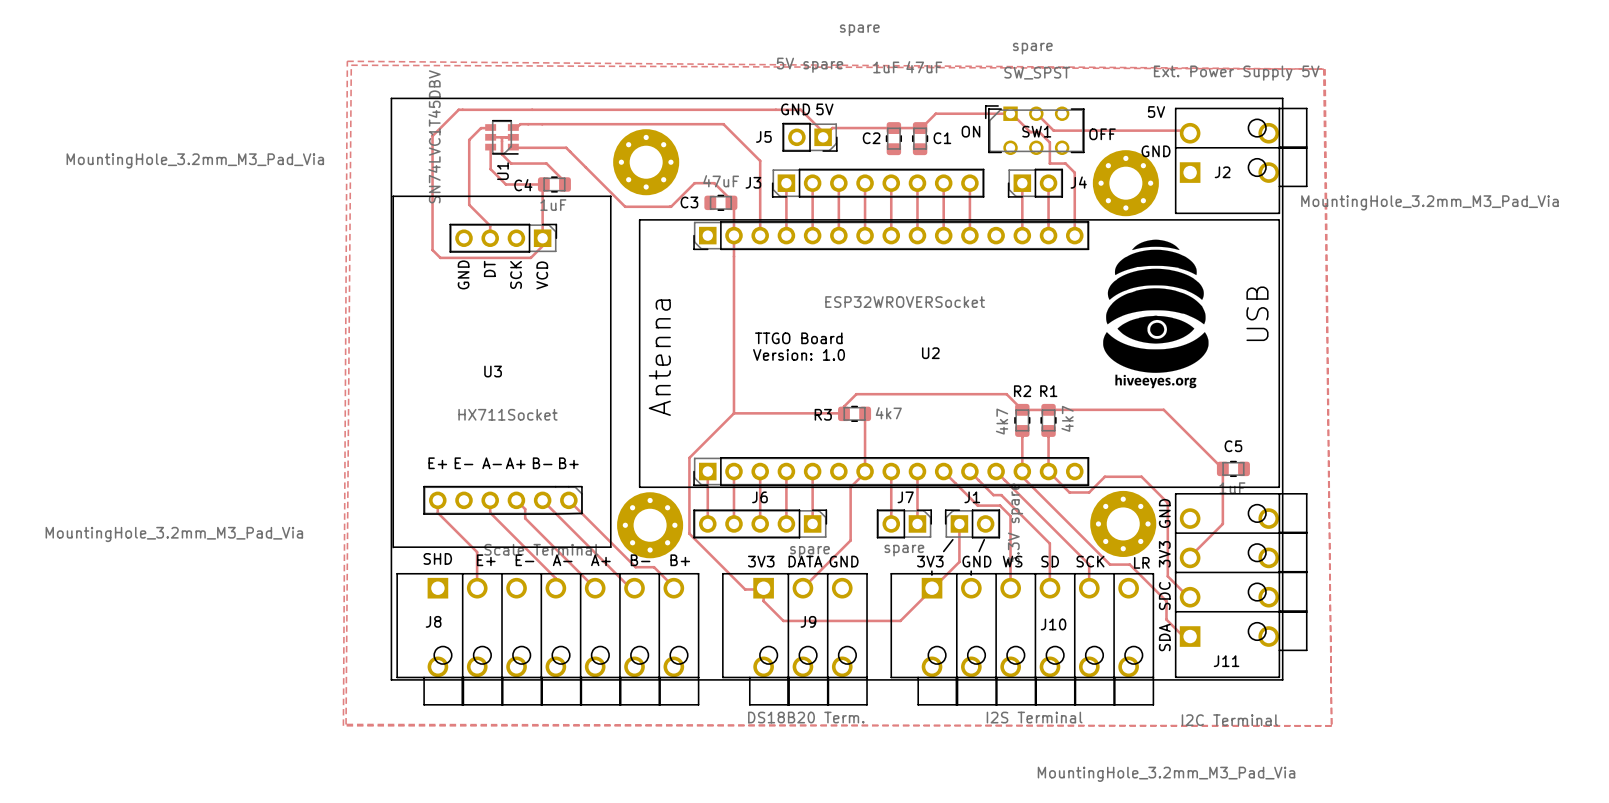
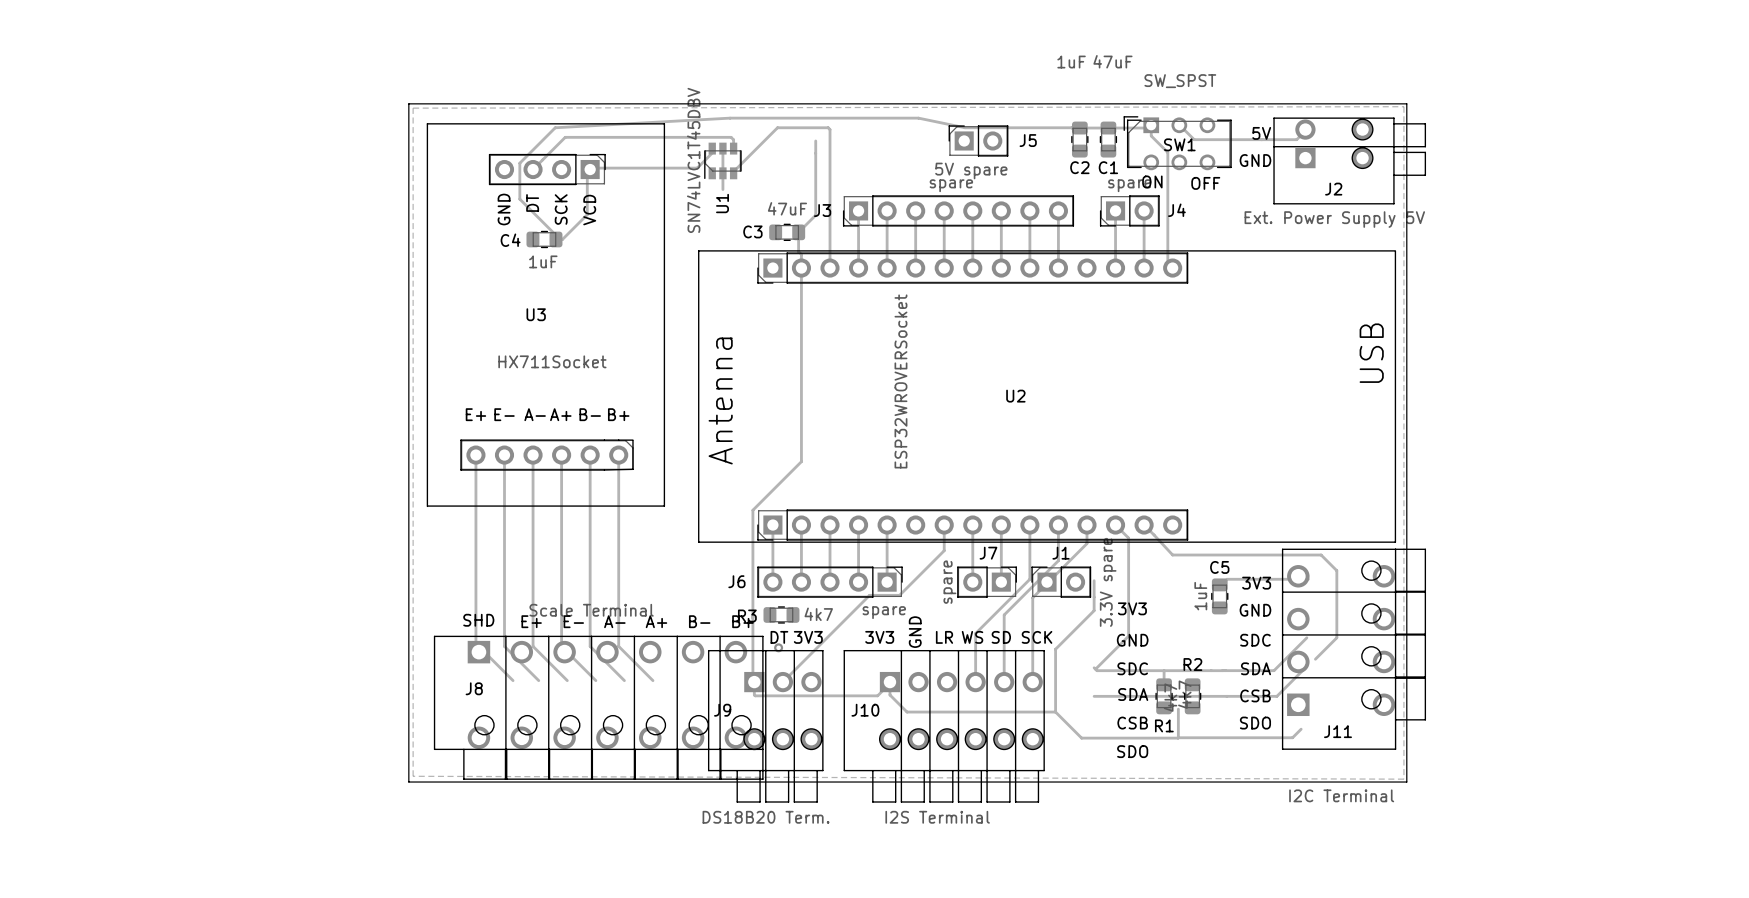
J3 value position: spare (859, 30) -> spare (951, 185)
J4 value position: spare (1032, 48) -> spare (1129, 185)
J5 value position: 5V spare (810, 65) -> 5V spare (971, 170)
J2 value position: Ext. Power Supply 5V (1236, 73) -> Ext. Power Supply 5V (1334, 219)
board edge: (391, 98) (391, 679) (1282, 679) (1282, 98) (391, 98) -> (408, 103) (408, 782) (1406, 782) (1406, 103) (408, 103)
track: none -> (1152, 123) (1148, 128) (1108, 128)
track: none -> (1151, 125) (1151, 135) (1167, 152) (1167, 264)
track: none -> (1179, 125) (1194, 139) (1296, 139) (1305, 130)
J2 footprint: [1175, 107, 1308, 214] -> [1273, 117, 1427, 205]
track: none -> (1106, 129) (1105, 128) (965, 127) (918, 118) (730, 118) (555, 127) (519, 163) (519, 199) (553, 232)
text: GND (795, 109) -> none
text: 5V (824, 109) -> none
track: (1010, 113) (935, 113) (921, 128) -> none
track: (1036, 113) (1053, 130) (1182, 130) -> none
track: (1017, 118) (1030, 132) (1039, 132) (1049, 142) (1049, 163) (1065, 163) (1074, 172) (1074, 235) -> none
track: none -> (722, 148) (722, 172)
track: none -> (733, 148) (733, 139) (731, 137) (565, 137) (533, 169)
track: (487, 128) (481, 128) (469, 139) (469, 204) (490, 225) (490, 238) -> none
track: (516, 128) (520, 124) (723, 124) (760, 160) -> (732, 172) (777, 127) (828, 127) (830, 129) (830, 186)
track: none -> (712, 152) (697, 168) (590, 168)
track: (918, 129) (832, 128) (829, 130) -> none
track: (821, 130) (800, 109) (458, 109) (432, 136) (432, 250) (440, 257) (530, 257) (543, 244) -> none
SW1 position: (1034, 130) -> (1177, 143)
text position: ON (970, 131) -> ON (1152, 181)
text position: OFF (1102, 134) -> OFF (1205, 183)
U1 value position: SN74LVC1T45DBV (434, 136) -> SN74LVC1T45DBV (693, 160)
track: (490, 137) (513, 137) -> none
track: (502, 137) (502, 154) (511, 163) (546, 163) (564, 181) -> none
U1 rotation: 0° (502, 137) -> 90° clockwise (722, 160)
U1 position: (502, 137) -> (722, 160)
J5 rotation: 0° (810, 137) -> 180° (978, 140)
J5 position: (810, 137) -> (978, 140)
C2 name position: C2 (871, 138) -> C2 (1079, 167)
C2 position: (893, 138) -> (1079, 139)
C1 position: (920, 138) -> (1108, 139)
C1 name position: C1 (942, 138) -> C1 (1108, 167)
track: none -> (587, 168) (587, 214) (562, 239) (555, 239)
track: (490, 147) (490, 169) (505, 184) (543, 184) -> none
track: (513, 147) (566, 147) (625, 206) (671, 206) (694, 183) (714, 183) (728, 197) -> none
track: none -> (722, 173) (722, 189)
text position: GND (1156, 151) -> GND (1255, 160)
part: MountingHole_3.2mm_M3_Pad_Via (646, 162) -> none
part: MountingHole_3.2mm_M3_Pad_Via (1125, 183) -> none
track: (542, 184) (542, 238) -> none
C4 position: (554, 184) -> (544, 239)
track: (733, 204) (733, 223) -> (815, 140) (815, 215) (798, 232) (798, 251) (801, 254)
drawing: [1103, 239, 1209, 389] -> none
U2 value rotation: 0° (905, 302) -> 90° counterclockwise (900, 381)
text: TTGO Board (798, 338) -> none
text: Version: 1.0 (799, 354) -> none
U3 position: (502, 371) -> (545, 315)
R1 name position: R1 (1048, 391) -> R1 (1164, 725)
track: none -> (475, 455) (475, 643) (513, 680)
track: none -> (504, 455) (504, 646) (538, 680)
track: none -> (533, 455) (533, 646) (567, 680)
track: none -> (561, 455) (561, 646) (595, 680)
track: none -> (590, 455) (590, 646) (624, 680)
track: none -> (618, 455) (618, 646) (652, 680)
track: (1047, 409) (1022, 409) (1006, 394) (856, 394) (843, 406) (843, 413) -> none
track: (1048, 409) (1163, 409) (1220, 466) -> none
track: (733, 413) (840, 413) -> none
R3 position: (854, 413) -> (781, 614)
track: (865, 413) (865, 471) -> none
R2 position: (1022, 420) -> (1192, 696)
R1 position: (1048, 420) -> (1164, 696)
track: (1022, 430) (1022, 476) (1110, 564) (1129, 564) (1166, 601) (1166, 619) (1182, 635) -> none
track: (1048, 430) (1048, 471) -> none
track: (1222, 468) (1222, 523) (1190, 556) -> none
C5 rotation: 0° (1233, 468) -> 90° clockwise (1219, 596)
C5 position: (1233, 468) -> (1219, 596)
track: (943, 471) (977, 505) (1000, 505) (1010, 516) (1010, 588) -> (1029, 525) (1029, 579) (975, 633) (975, 677)
track: (969, 471) (993, 495) (1001, 495) (1049, 543) (1049, 588) -> none
track: (996, 471) (1089, 564) (1089, 588) -> none
track: none -> (1115, 525) (1128, 538) (1128, 636) (1095, 669)
track: (865, 472) (850, 487) (850, 540) (802, 588) -> (944, 526) (944, 550) (899, 595) (869, 595) (782, 682)
track: none -> (1058, 526) (1058, 560) (1004, 614) (1004, 682)
track: none -> (1086, 529) (1086, 543) (1032, 597) (1032, 682)
track: (1057, 480) (1069, 492) (1089, 492) (1104, 476) (1141, 476) (1167, 502) (1167, 576) (1183, 592) -> (1154, 535) (1172, 555) (1321, 555) (1336, 570) (1336, 637) (1315, 659)
J6 name position: J6 (759, 497) -> J6 (736, 581)
track: (437, 500) (437, 512) (477, 552) (477, 586) -> none
track: (490, 500) (490, 512) (555, 578) (555, 588) -> none
track: (516, 500) (525, 509) (525, 518) (595, 588) -> none
track: (542, 500) (630, 588) (634, 588) -> none
track: (568, 500) (635, 567) (654, 567) (673, 586) -> none
text rotation: 0° (1164, 513) -> 90° clockwise (1255, 610)
text position: GND (1164, 513) -> GND (1255, 610)
track: none -> (1308, 579) (1226, 579) (1221, 584)
track: none -> (1094, 580) (1094, 610) (1055, 649) (1055, 712)
track: (959, 523) (959, 561) (900, 620) (783, 620) (763, 601) (763, 588) -> none
part: MountingHole_3.2mm_M3_Pad_Via (1123, 523) -> none
part: MountingHole_3.2mm_M3_Pad_Via (650, 525) -> none
track: (689, 533) (745, 589) (754, 589) -> (752, 592) (752, 683)
line: (952, 539) (943, 551) -> none
line: (984, 539) (979, 551) -> none
text: none -> 3V3 (1132, 608)
J7 value rotation: 0° (904, 550) -> 90° counterclockwise (949, 582)
text rotation: 0° (1164, 554) -> 90° clockwise (1256, 583)
text position: 3V3 (761, 561) -> 3V3 (808, 637)
text: DATA (805, 561) -> none
text rotation: 0° (844, 561) -> 90° counterclockwise (915, 632)
text: 3V3 (930, 561) -> none
text position: GND (976, 561) -> GND (1132, 640)
text position: WS (1012, 561) -> WS (972, 637)
text position: SD (1050, 561) -> SD (1001, 637)
text position: SCK (1090, 561) -> SCK (1037, 637)
text: LR (1141, 562) -> none
line: (931, 571) (931, 575) -> none
line: (971, 571) (971, 575) -> none
J9 footprint: [722, 573, 868, 706] -> [707, 649, 824, 803]
J10 footprint: [890, 573, 1155, 706] -> [843, 649, 1045, 803]
text: none -> DT (779, 637)
text: none -> 3V3 (879, 637)
text: none -> LR (944, 637)
track: none -> (1306, 637) (1274, 670) (1097, 670) (1094, 667)
via: none -> (778, 647)
text rotation: 0° (1164, 596) -> 90° clockwise (1255, 640)
track: none -> (1306, 666) (1276, 696) (1094, 696)
text: none -> SDC (1132, 668)
track: none -> (1164, 670) (1164, 678)
track: none -> (889, 680) (892, 680) (877, 695) (755, 695) (754, 682)
track: none -> (889, 682) (889, 695) (907, 712) (1055, 712)
J9 name position: J9 (808, 621) -> J9 (722, 710)
J10 name position: J10 (1053, 624) -> J10 (865, 710)
text: none -> SDA (1133, 694)
text: none -> CSB (1255, 695)
text rotation: 0° (1164, 637) -> 90° clockwise (1256, 668)
text position: SDA (1164, 637) -> SDA (1256, 668)
track: none -> (1178, 709) (1178, 737)
track: none -> (1055, 712) (1081, 738) (1178, 737)
text: none -> CSB (1132, 723)
text: none -> SDO (1255, 723)
track: none -> (1301, 729) (1292, 737) (1178, 737)
text: none -> SDO (1132, 751)
zone outline: (1331, 725) (346, 724) (351, 65) (1323, 69) (1331, 725) -> (1403, 106) (413, 108) (413, 776) (1403, 779) (1403, 106)
zone outline: (1331, 725) (343, 725) (347, 61) (1325, 69) (1331, 725) -> none

